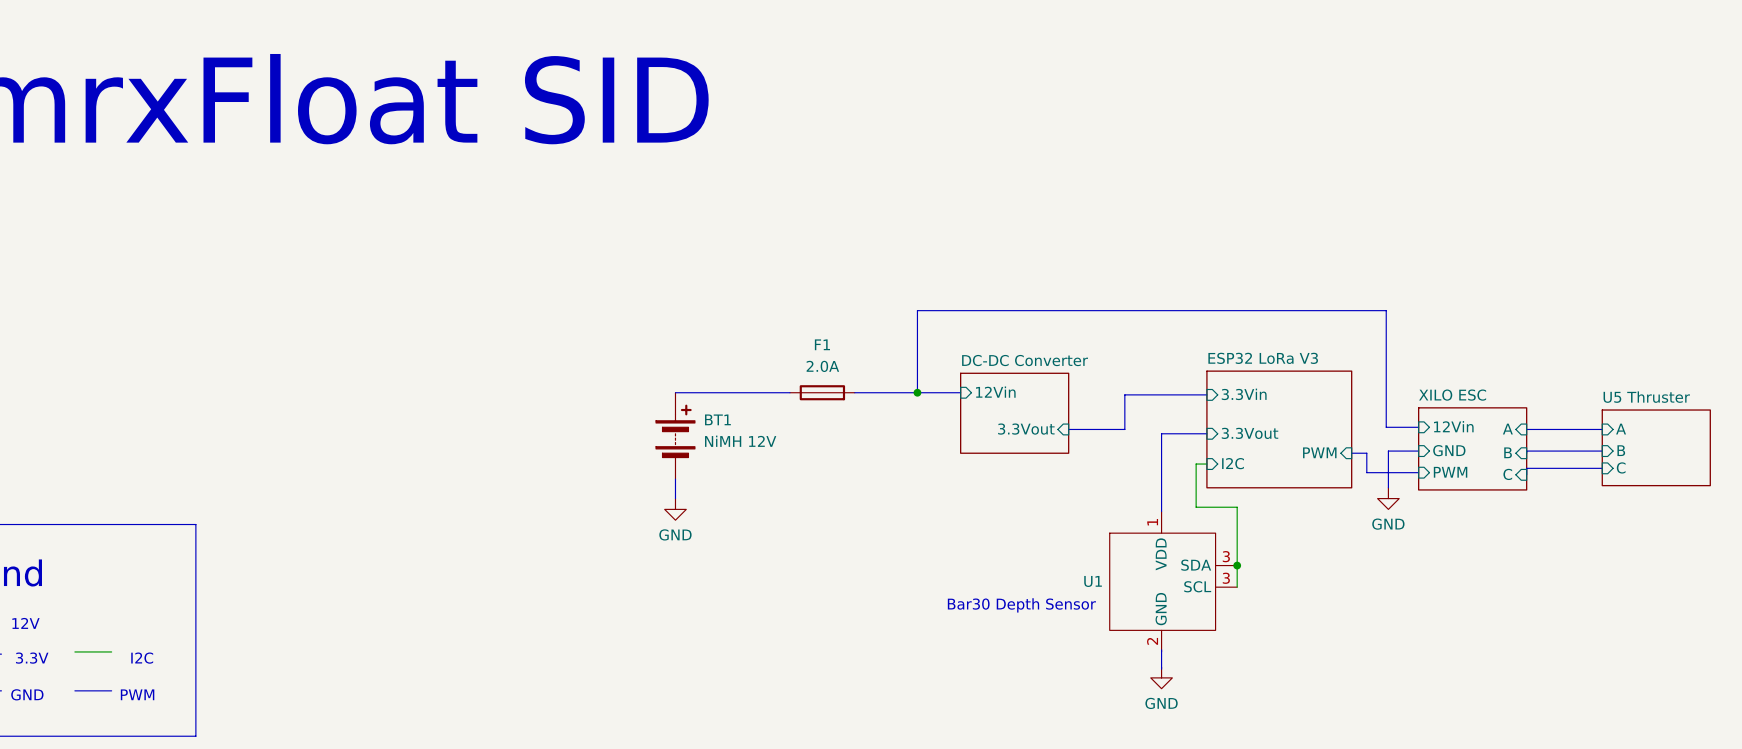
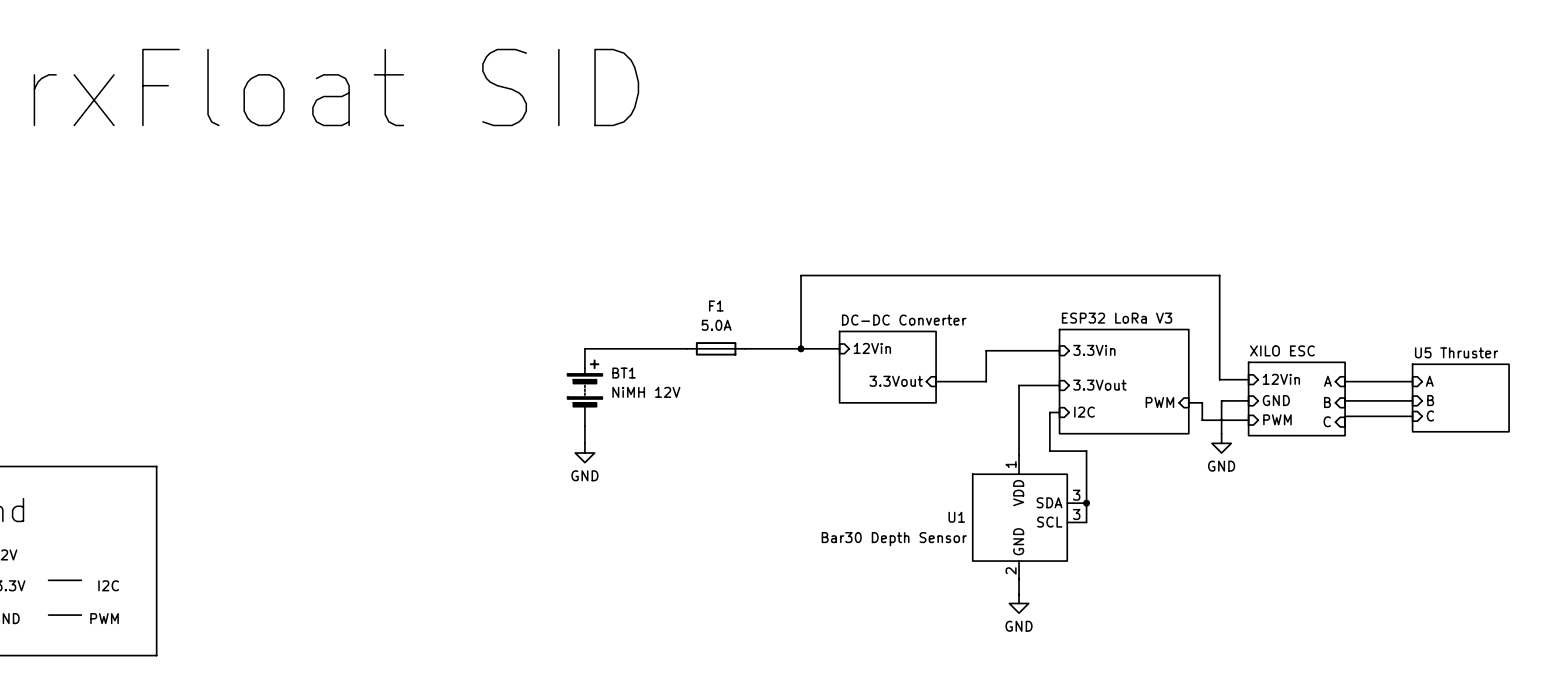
F1 value: 2.0A (822, 366) -> 5.0A (716, 325)

